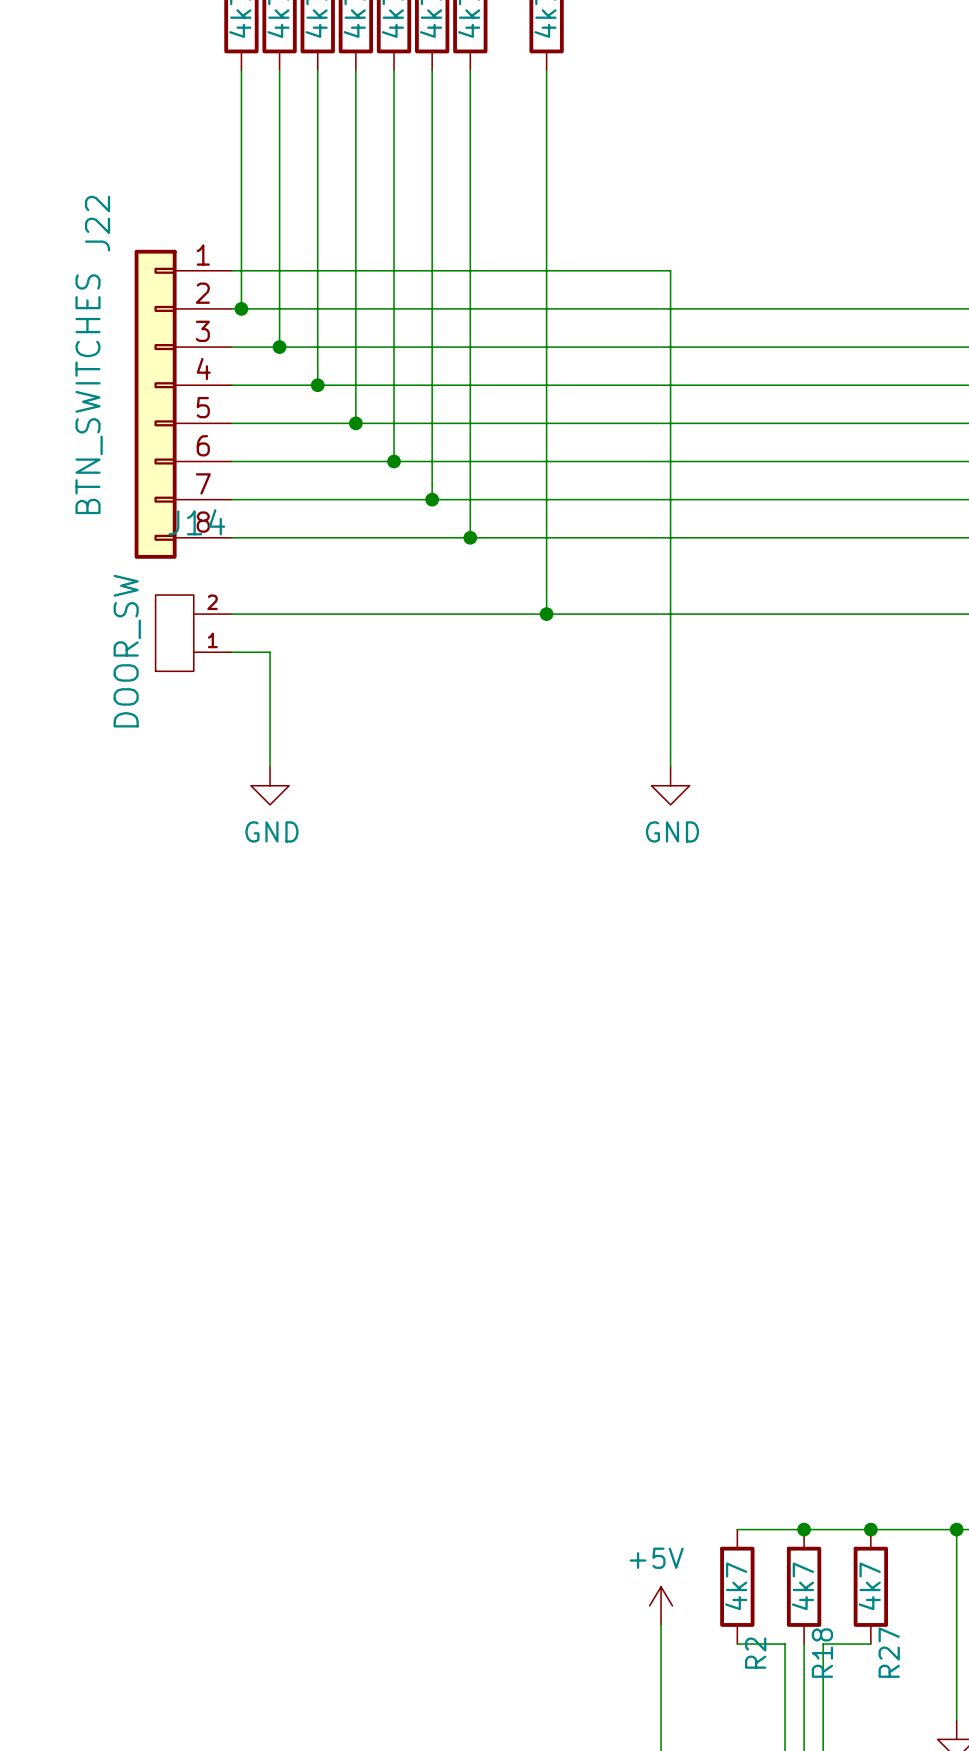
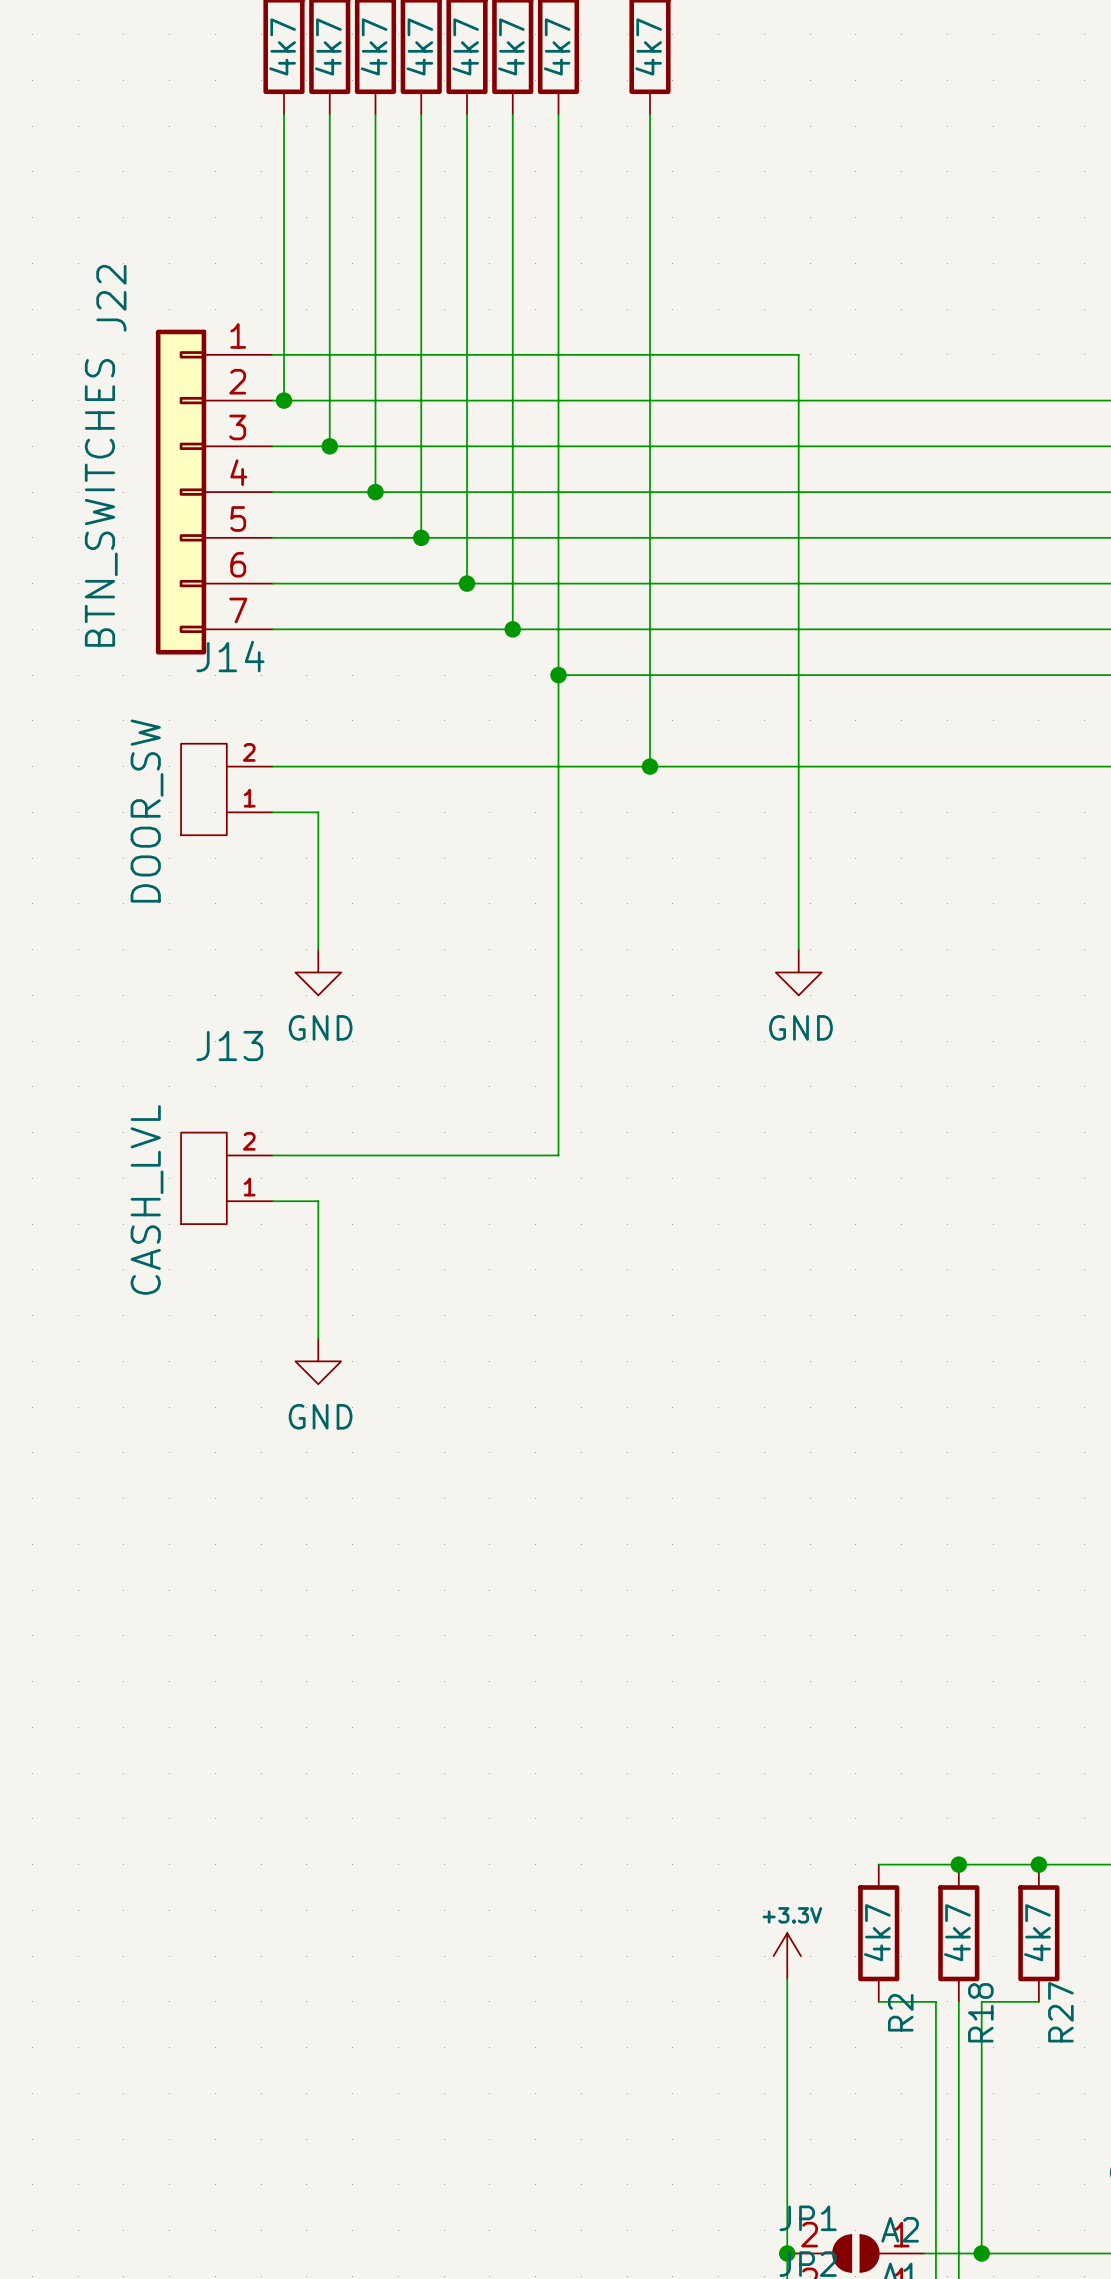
J22 symbol: [134, 249, 232, 559] -> [155, 329, 273, 655]
wire: (231, 537) (470, 537) -> (272, 1155) (558, 1155) (558, 675)
J13: none -> CASH_LVL (226, 1178)
wire: none -> (272, 1201) (318, 1201) (318, 1338)
power symbol: none -> GND (318, 1361)
power symbol: +5V (661, 1605) -> +3.3V (787, 1956)

